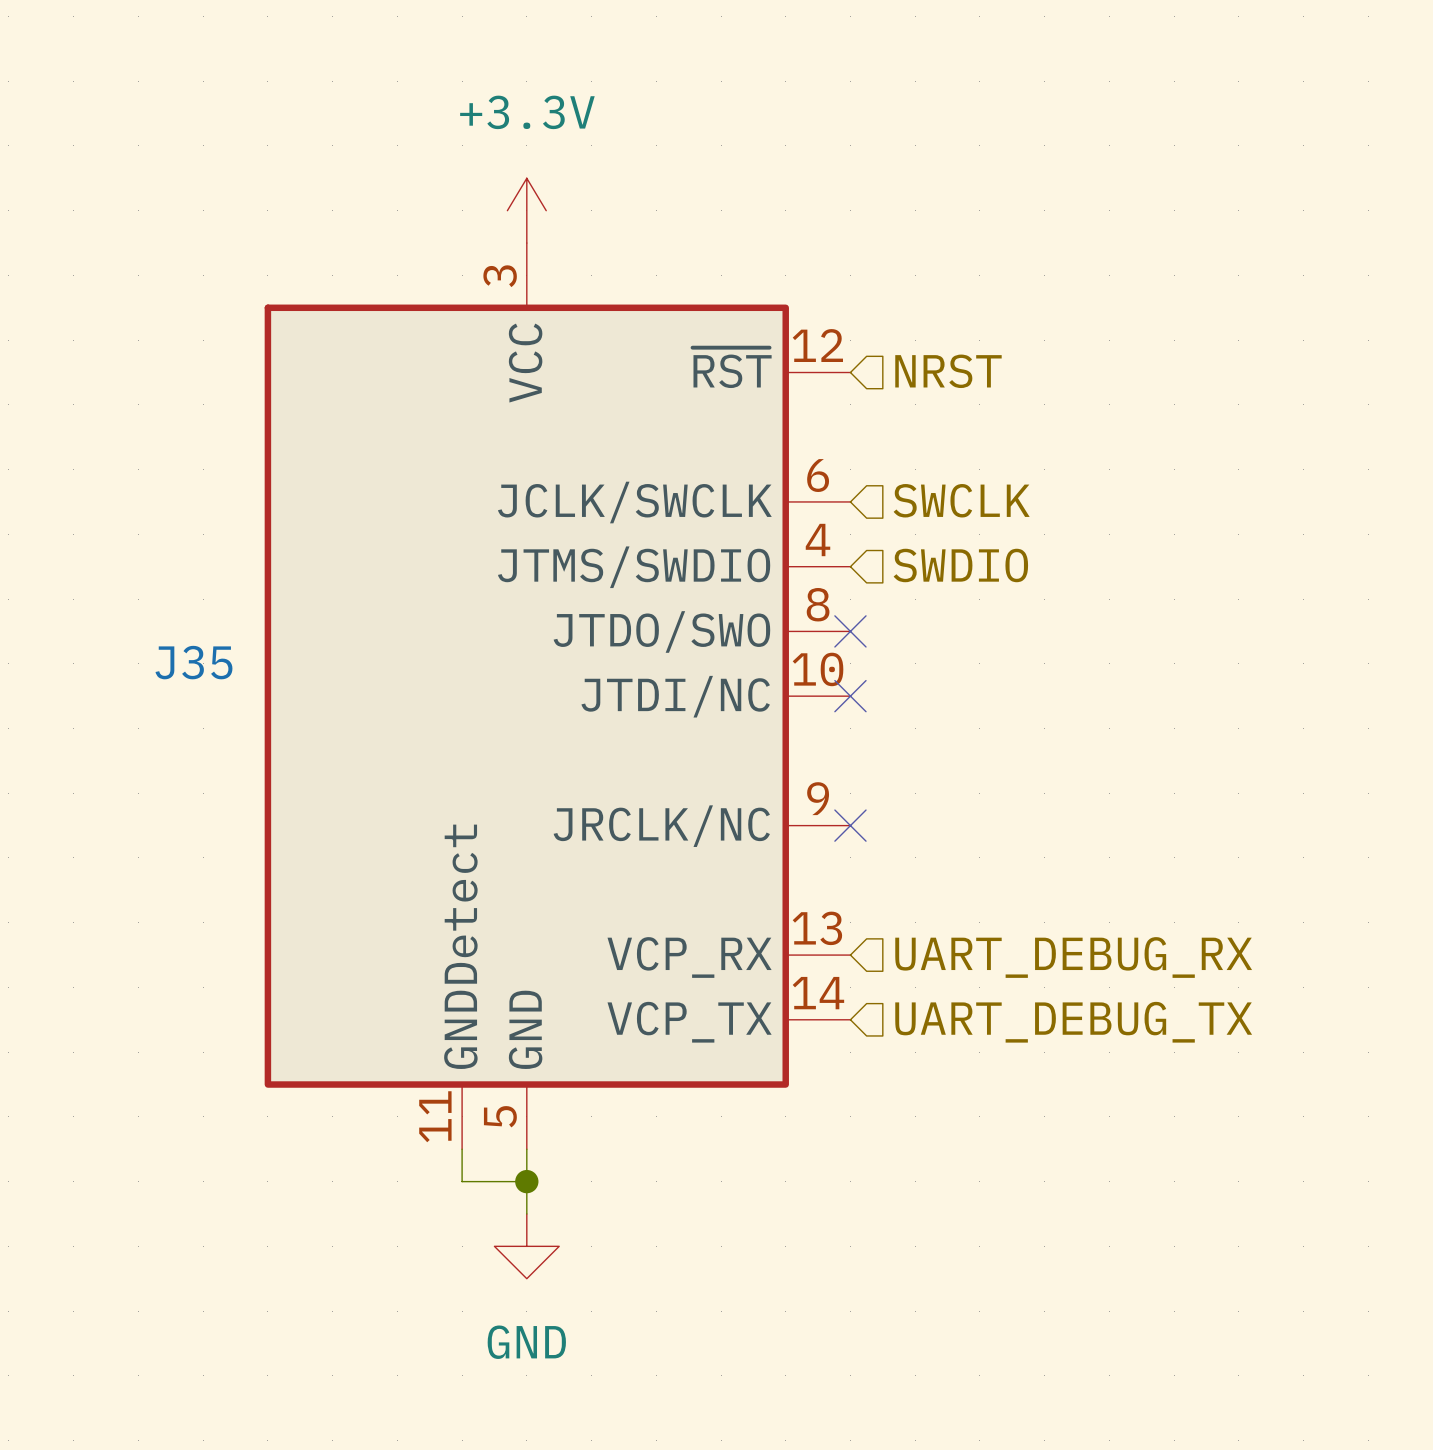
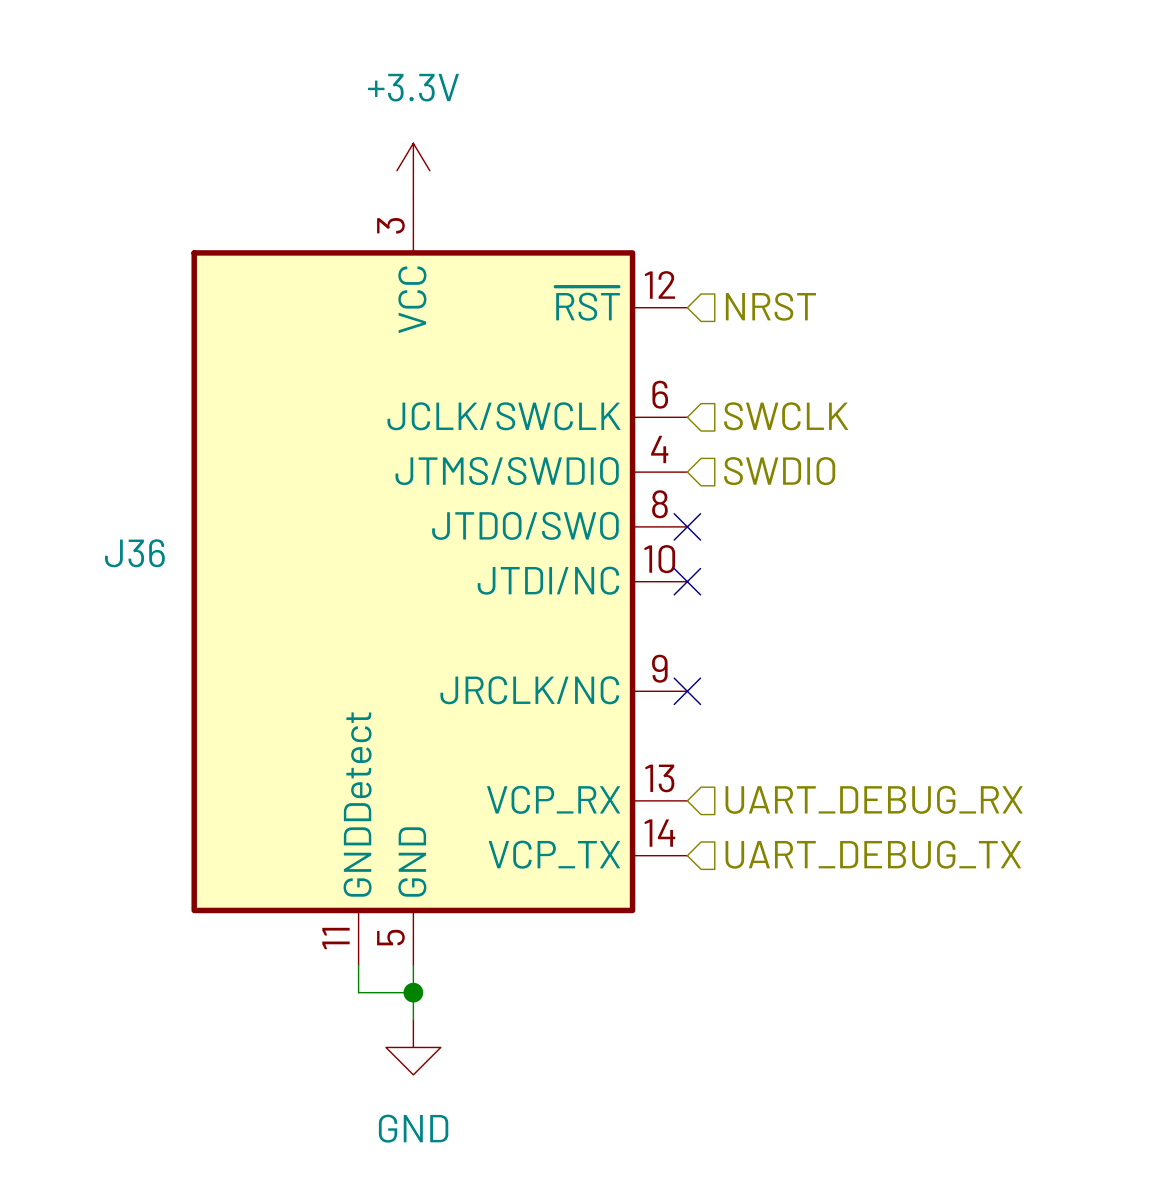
J35 name: J35 (193, 662) -> J36 (134, 553)

